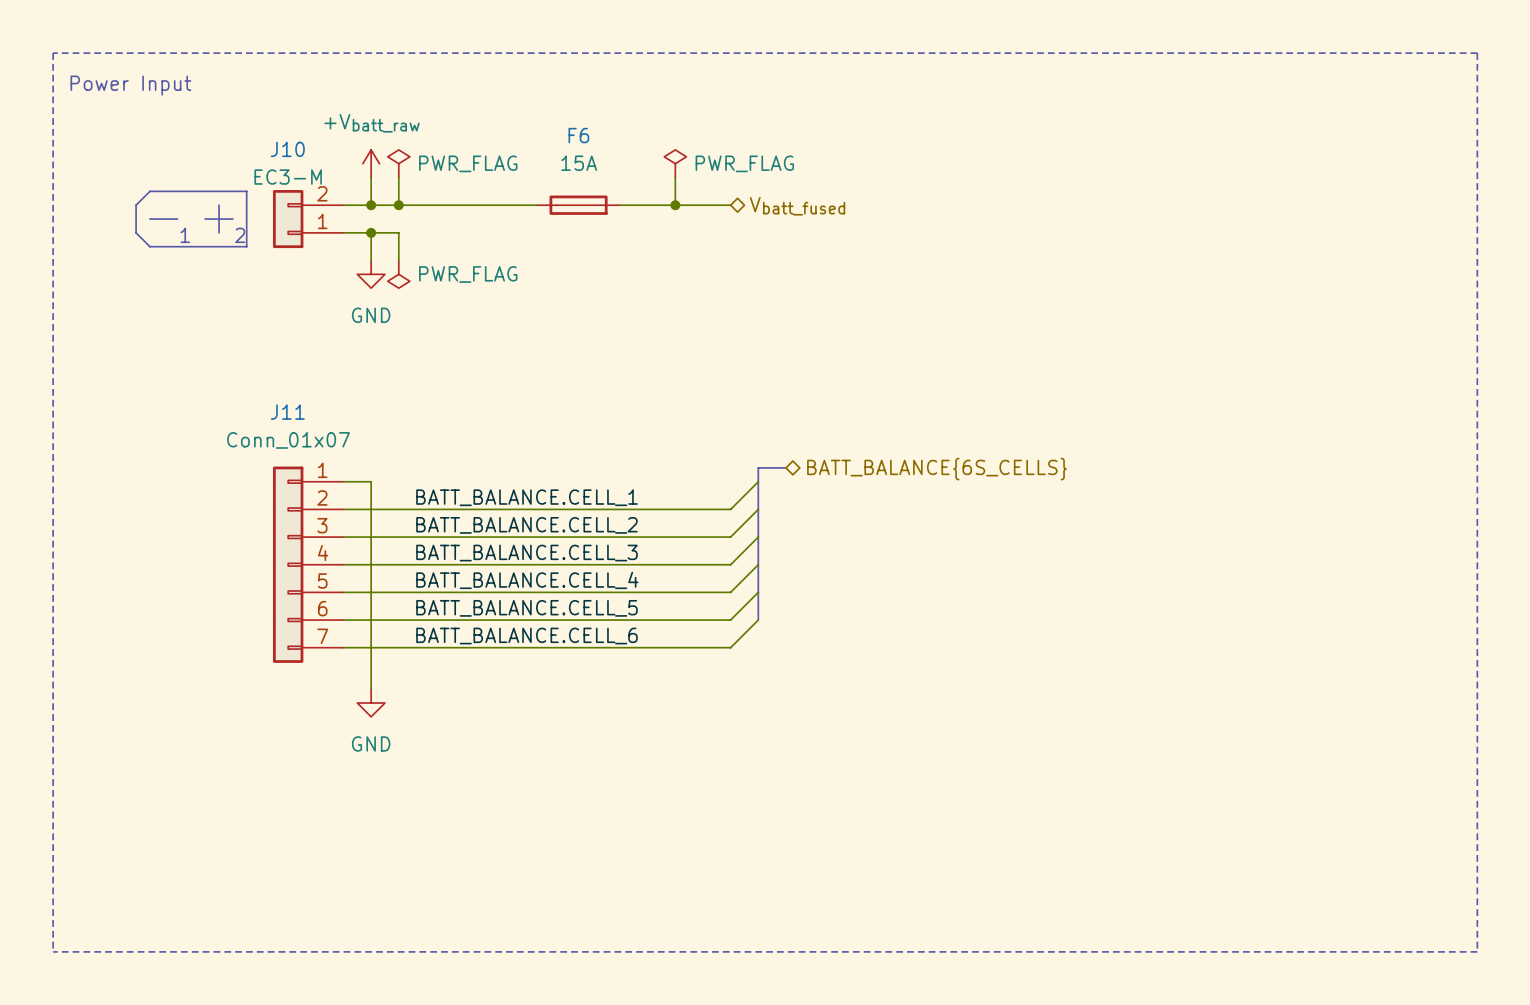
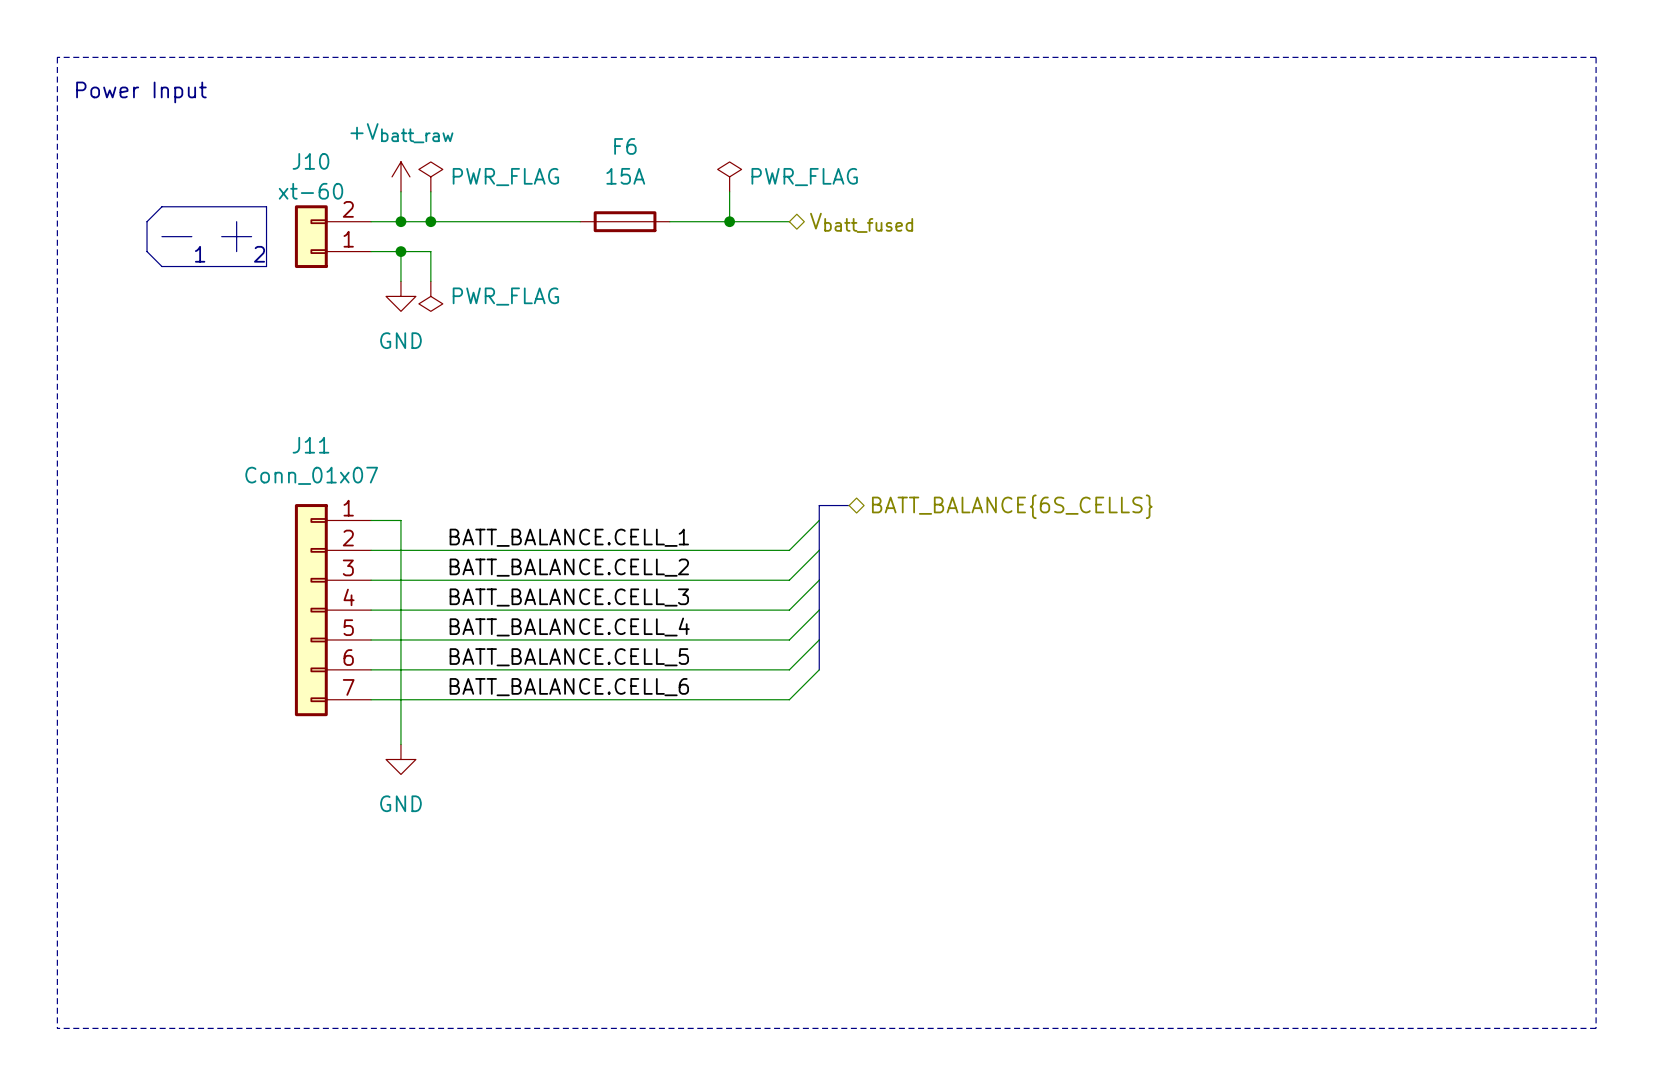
J10 value: EC3-M (288, 177) -> xt-60 (310, 191)

